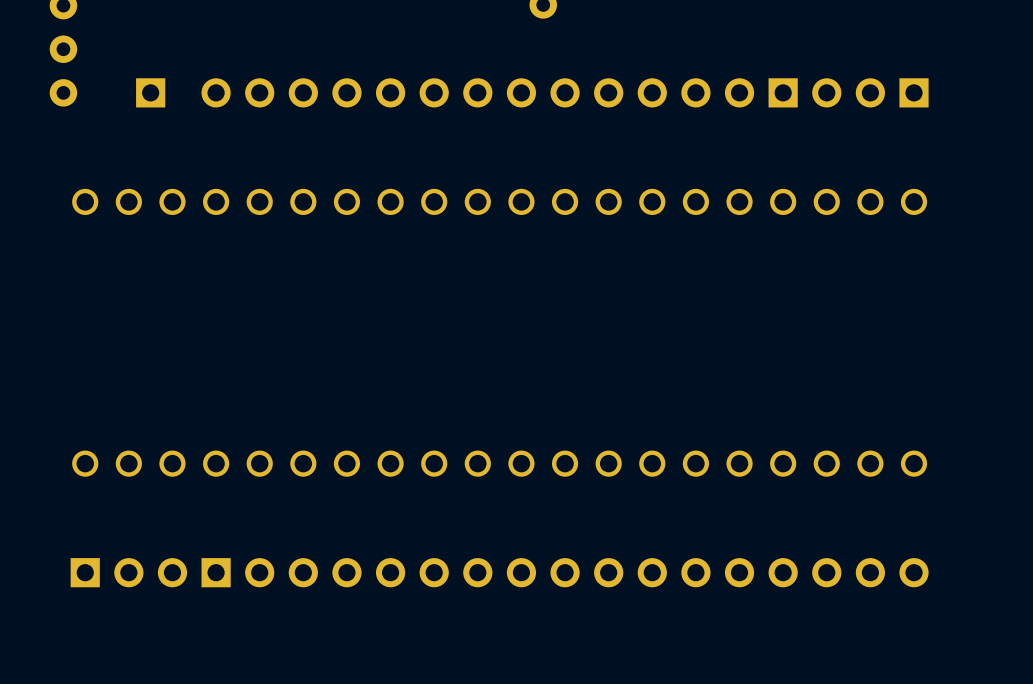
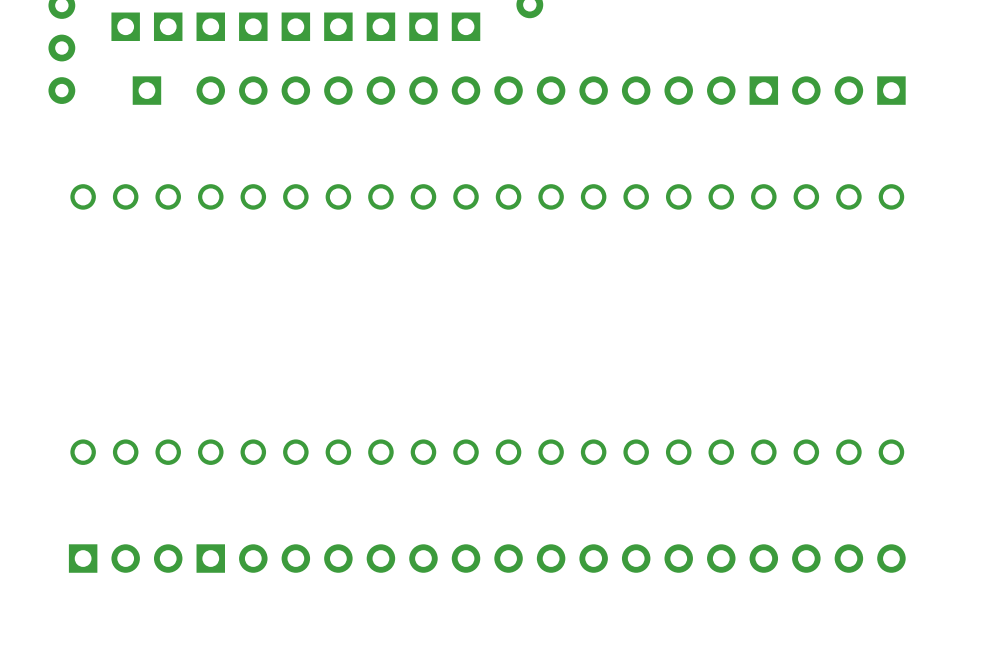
part: none -> (125, 26)
part: none -> (168, 26)
part: none -> (210, 26)
part: none -> (253, 26)
part: none -> (295, 26)
part: none -> (338, 26)
part: none -> (380, 26)
part: none -> (423, 26)
part: none -> (466, 26)

